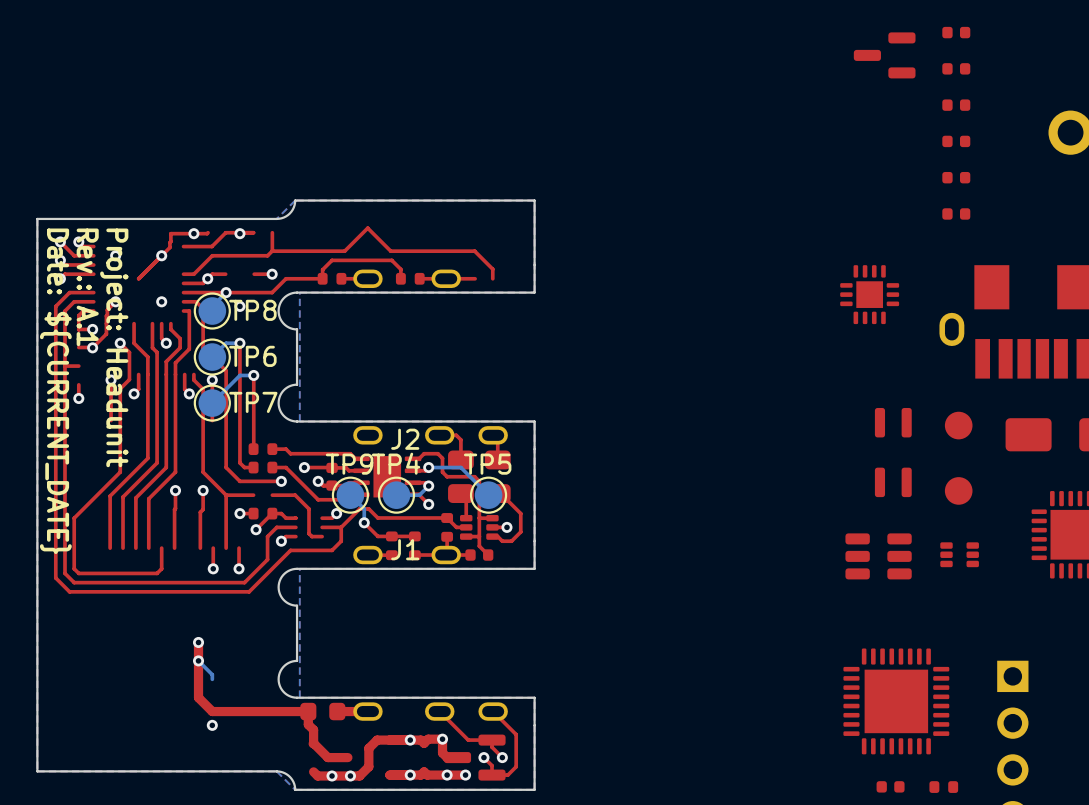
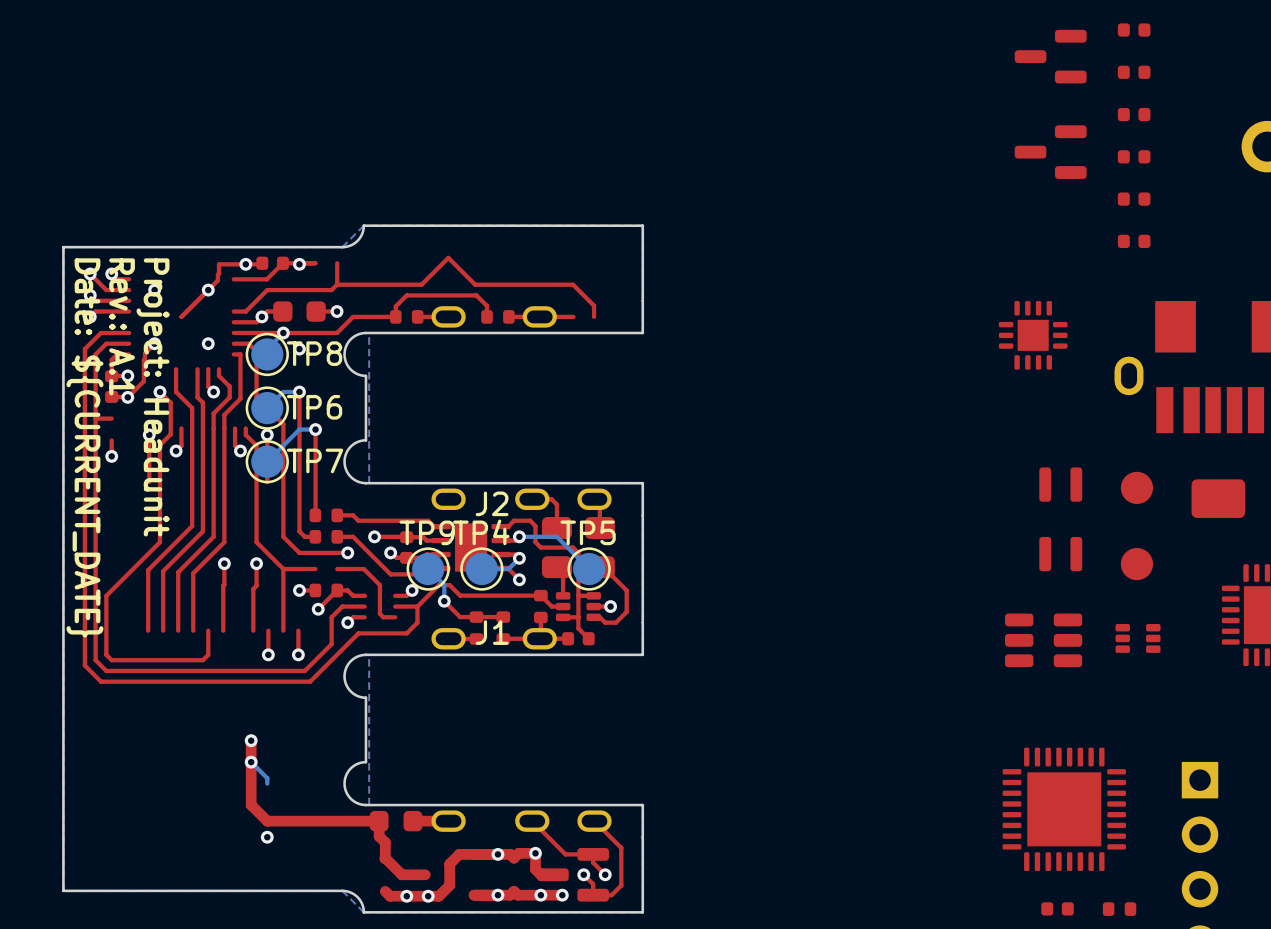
part: none -> (1050, 152)
part: none -> (272, 263)
part: none -> (299, 311)
part: none -> (111, 386)

